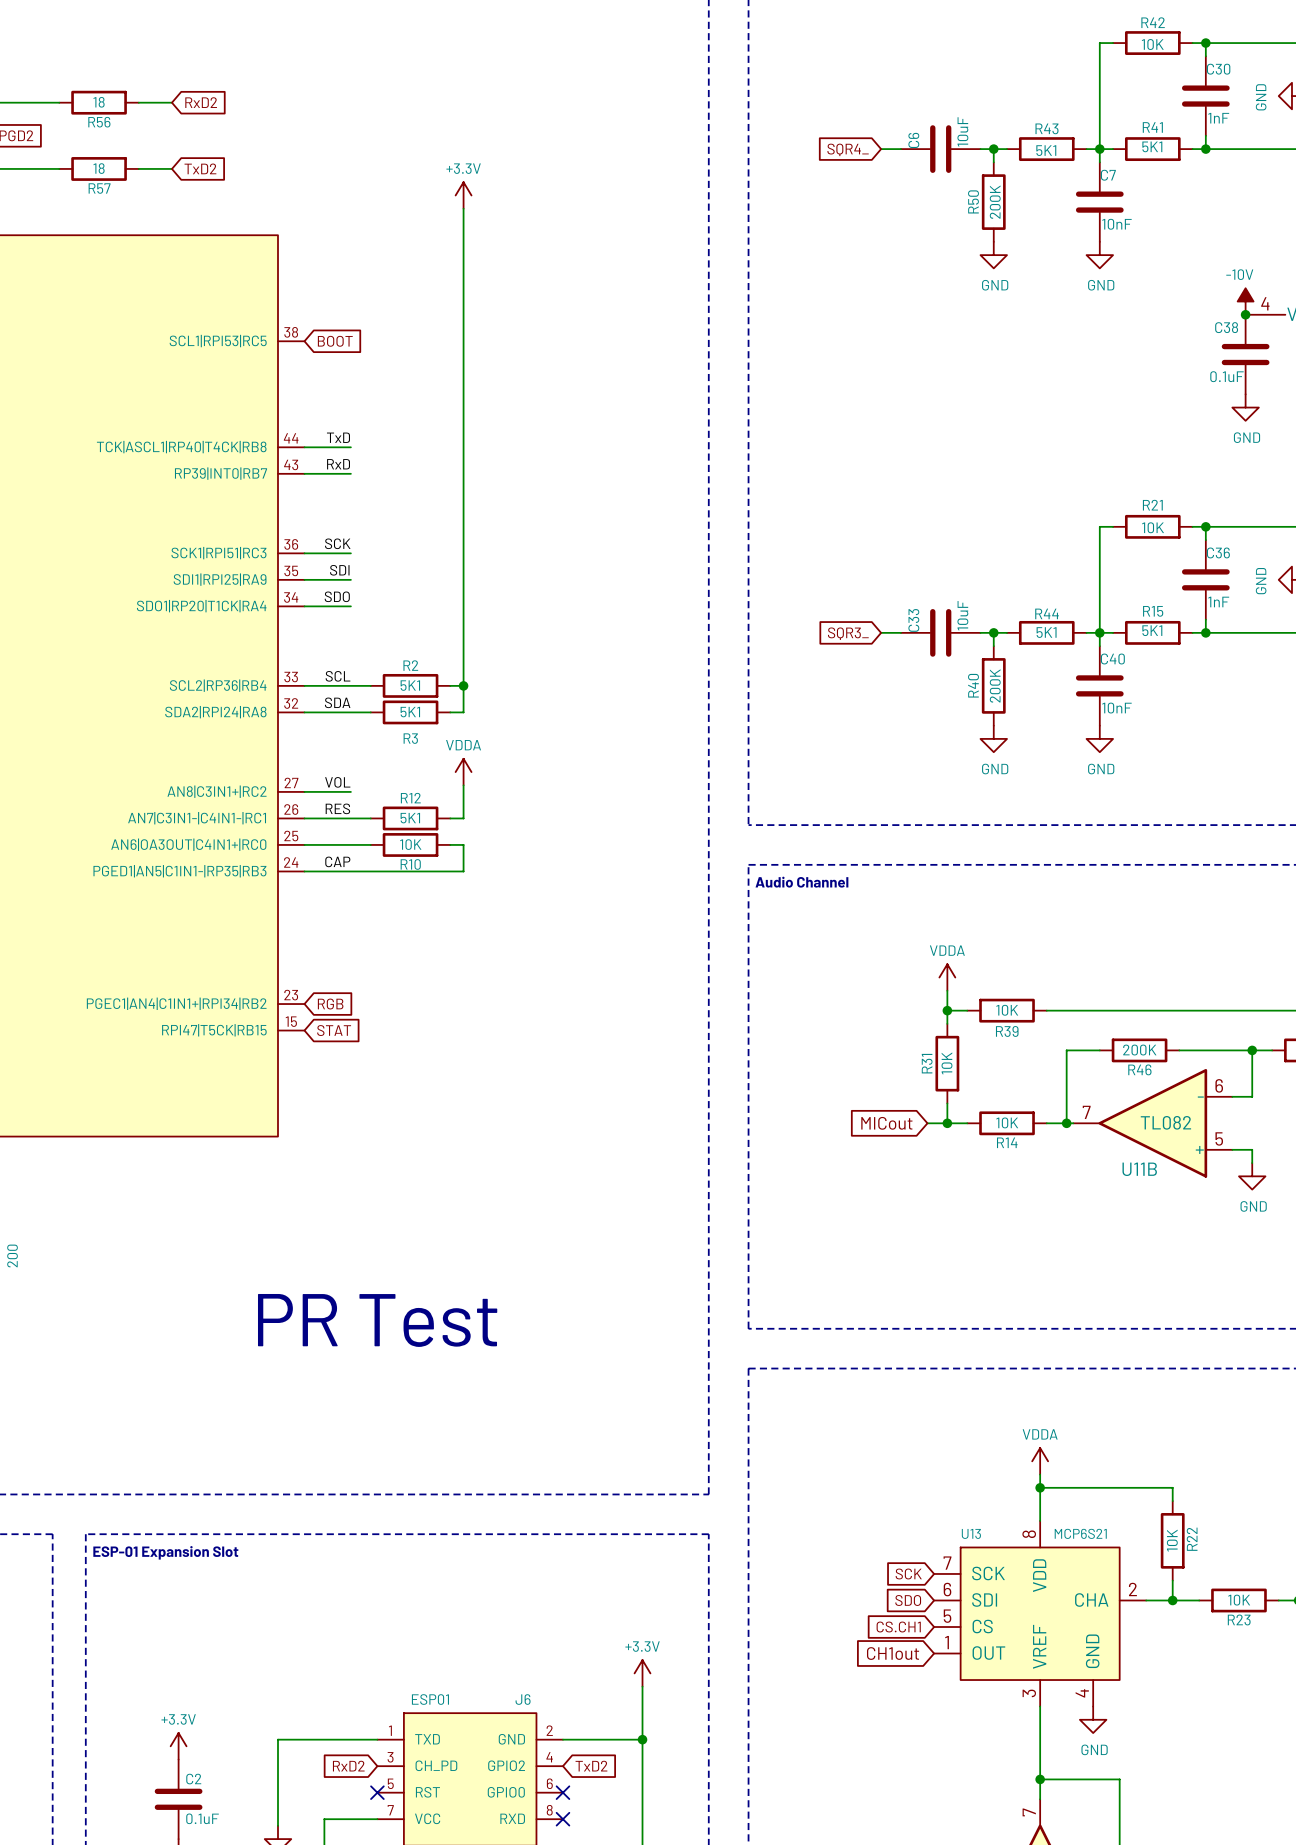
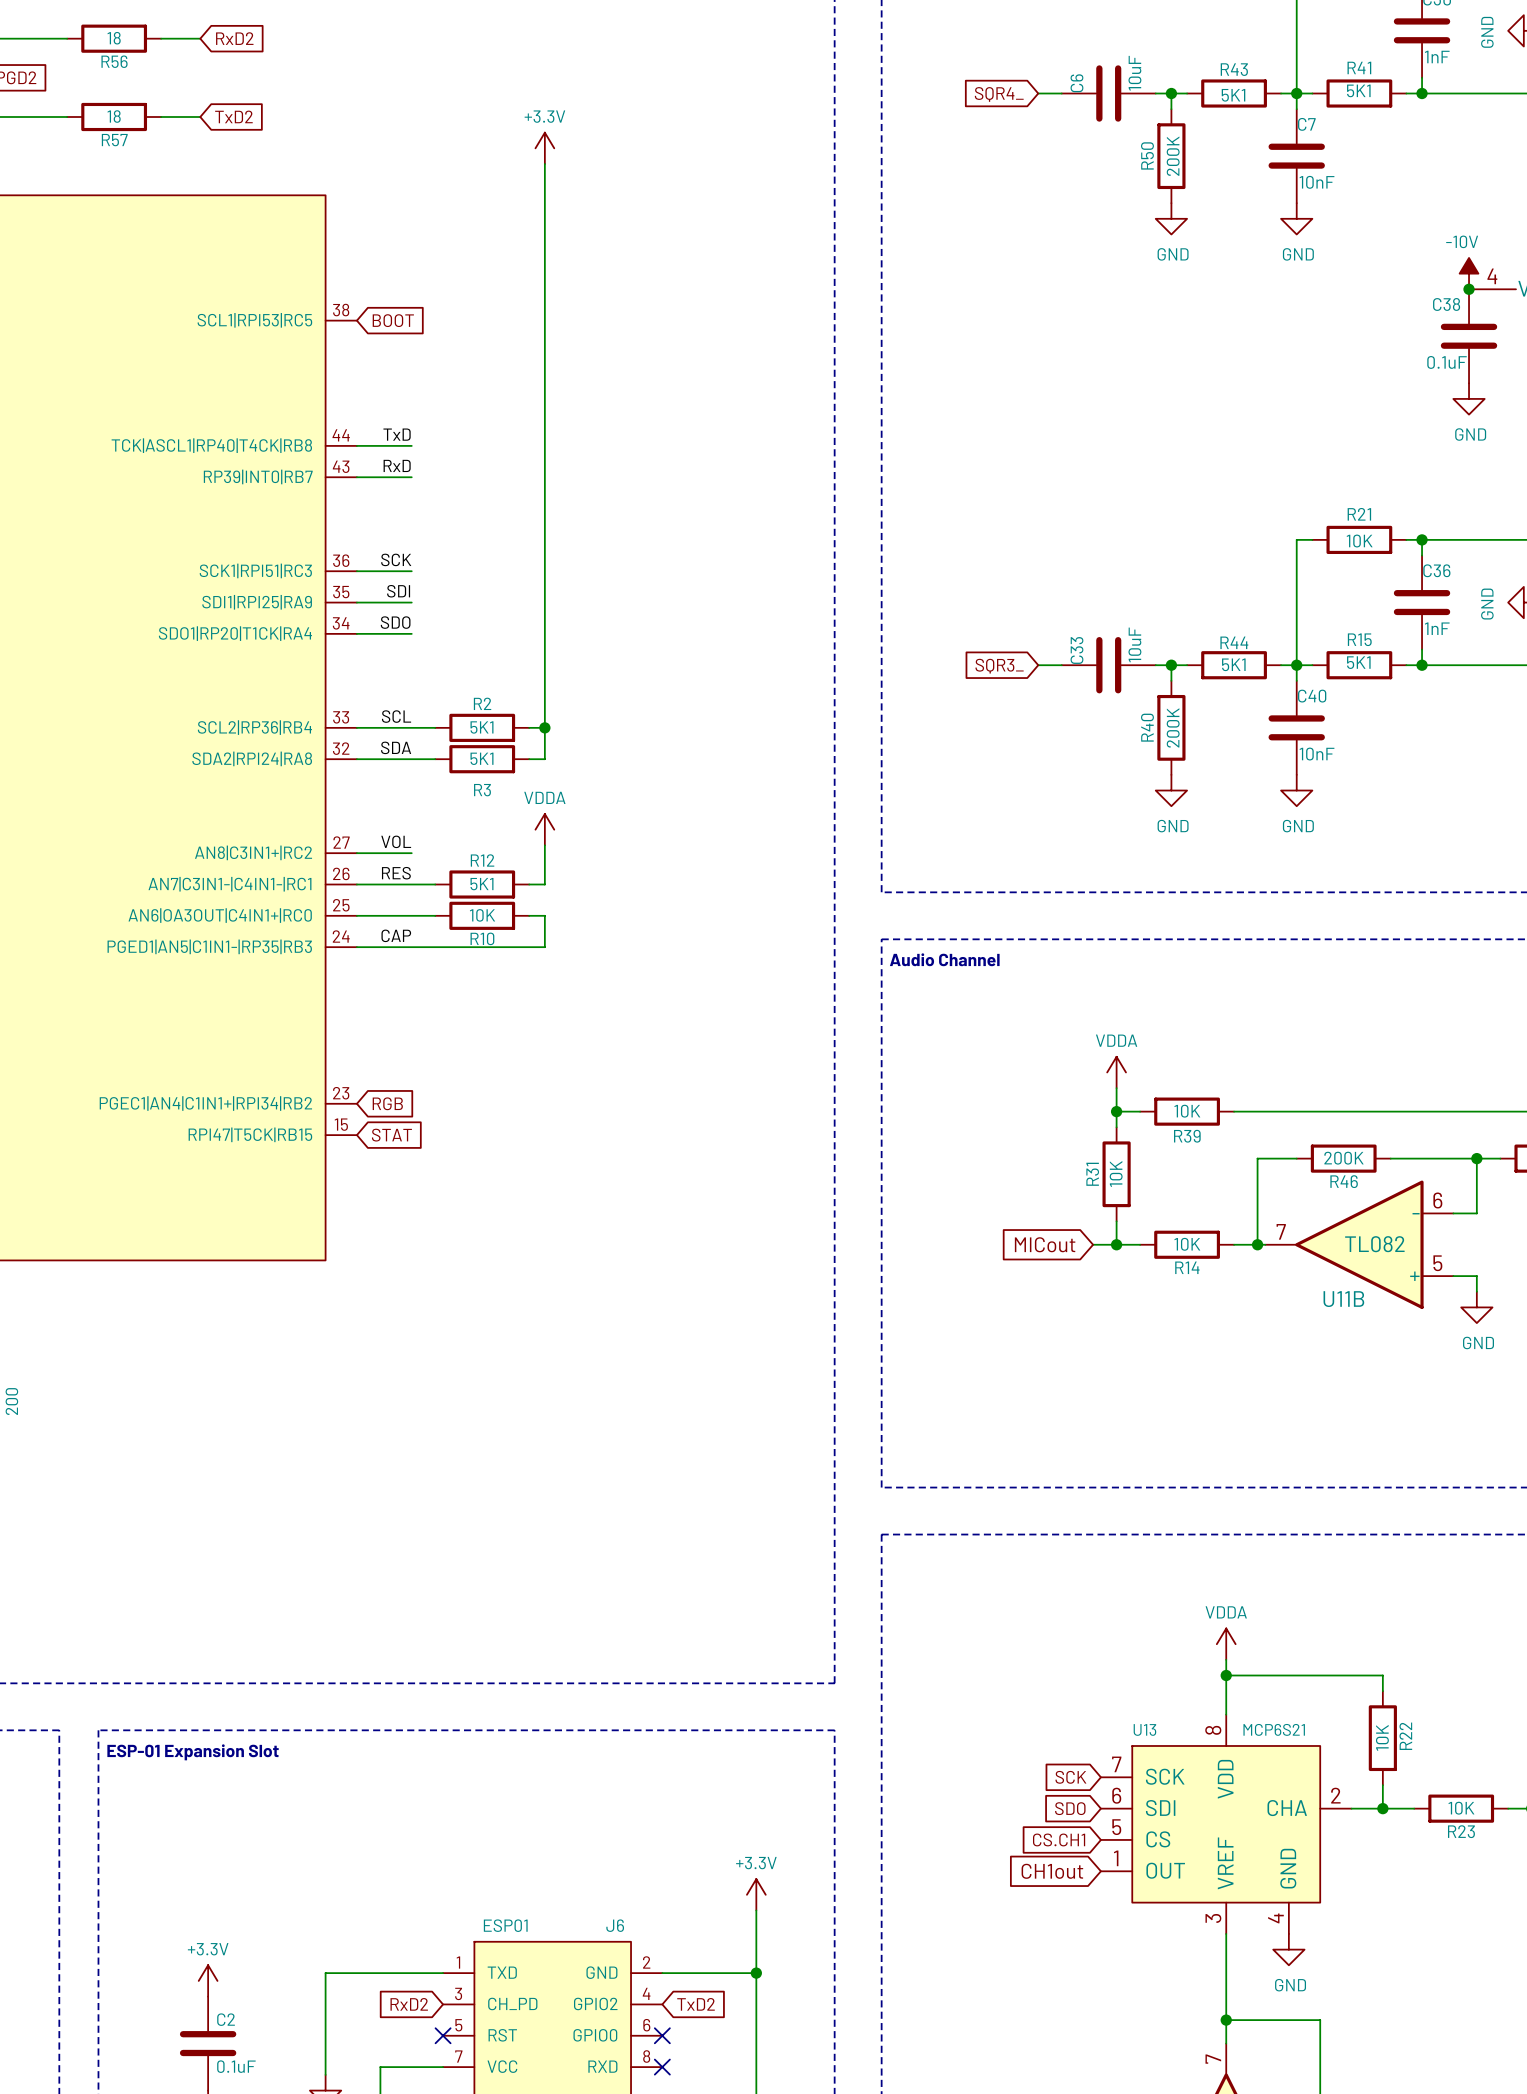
text: PR Test (377, 1320) -> none

